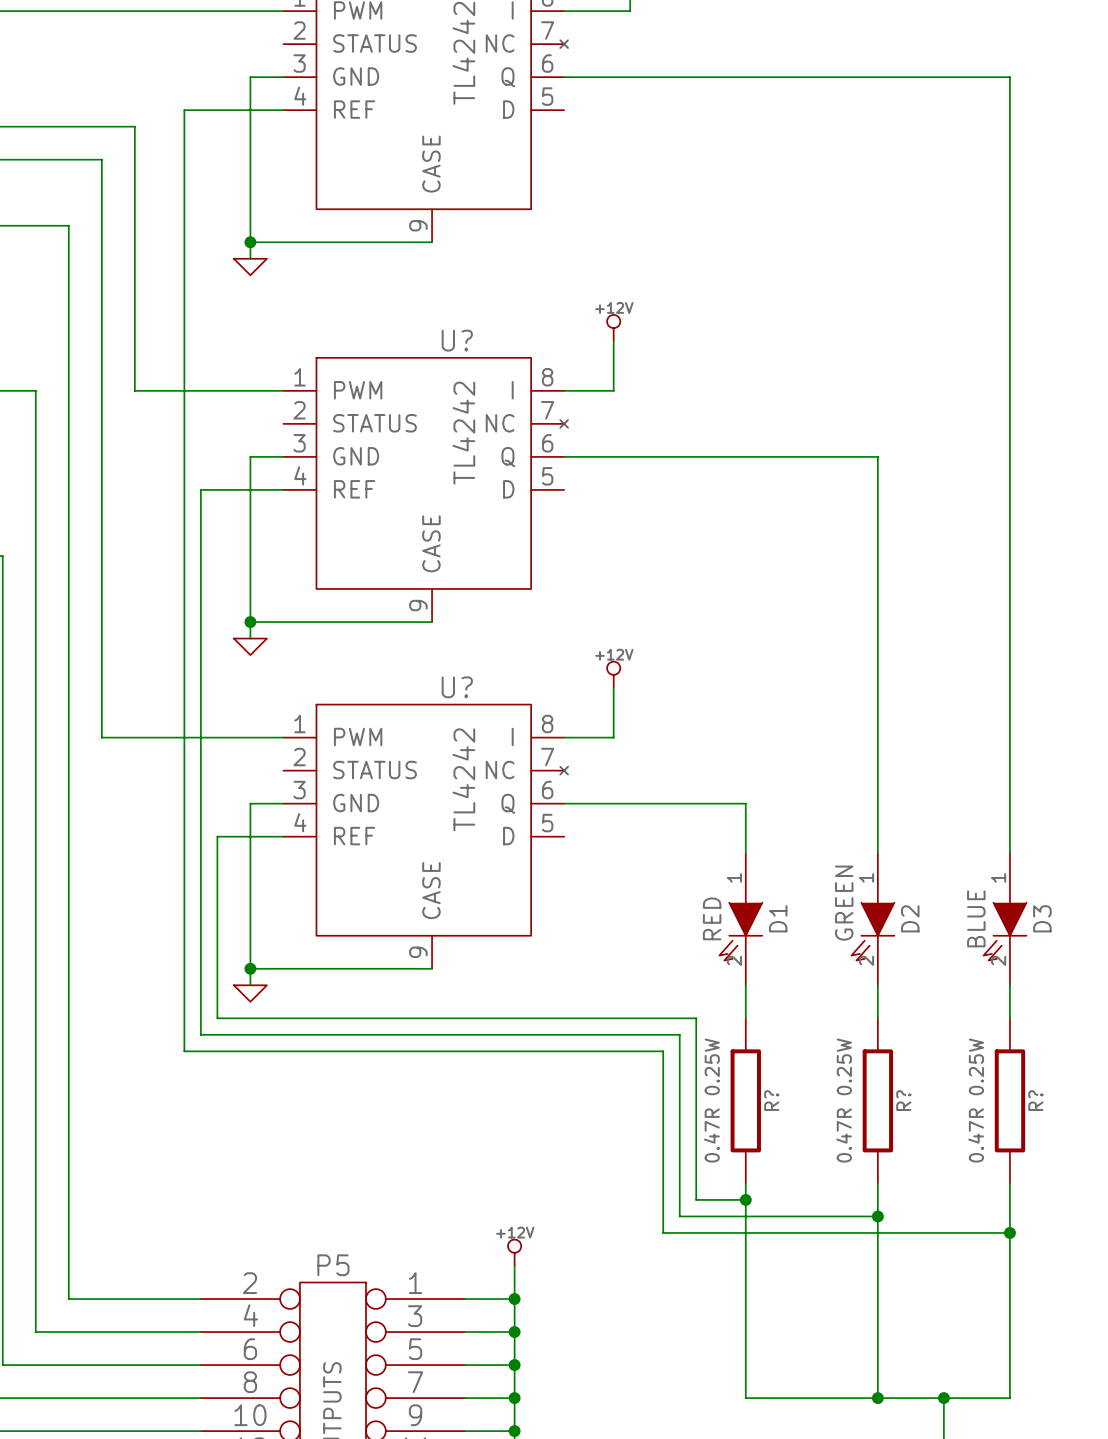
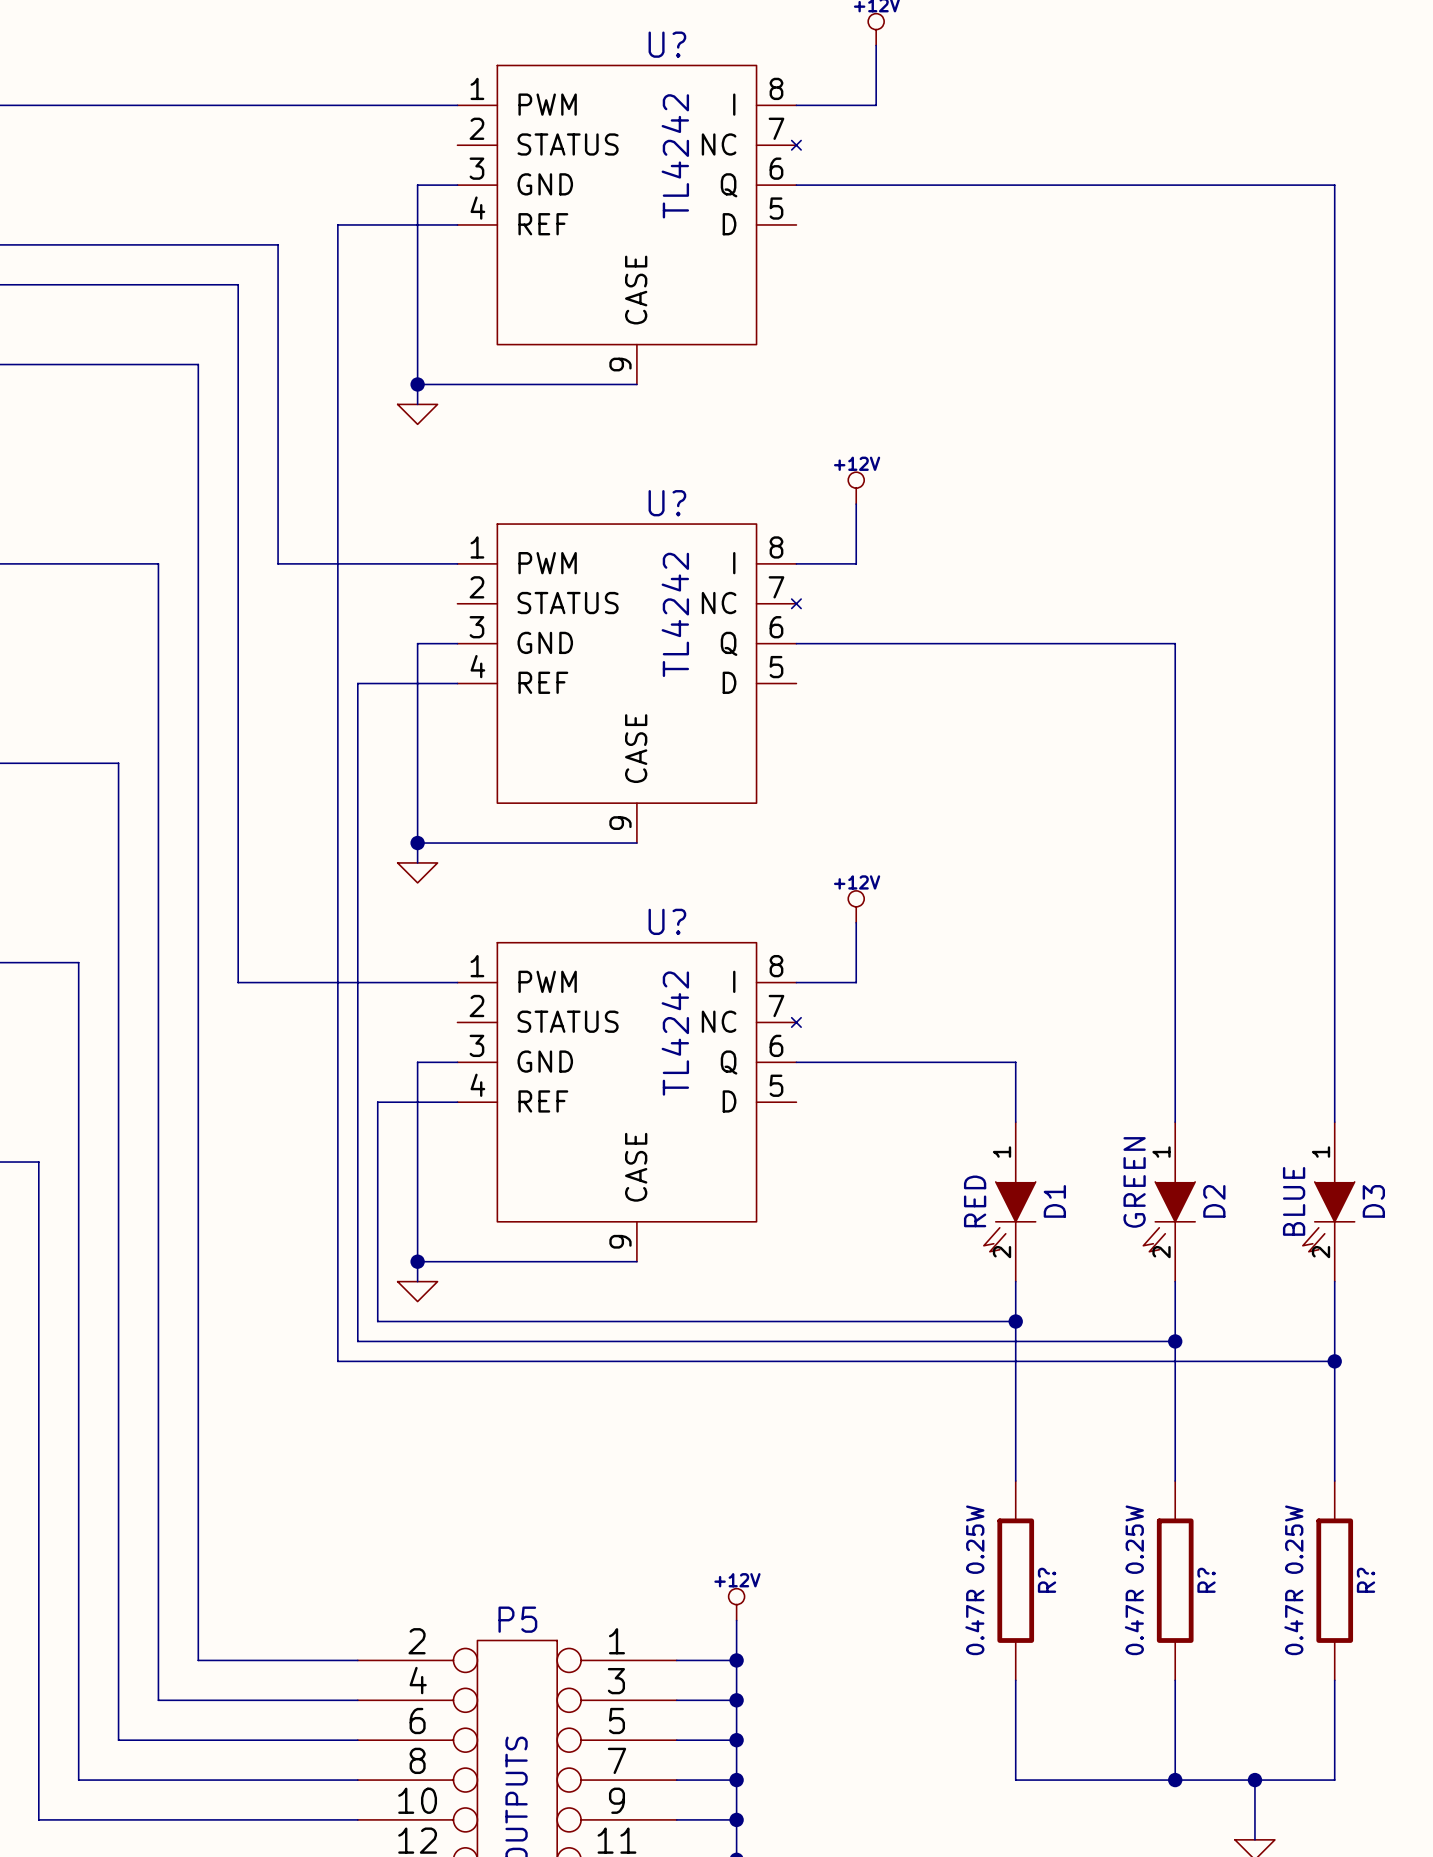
wire: (696, 1018) (696, 1199) (745, 1199) -> (955, 1321) (1015, 1321) (1015, 1481)
junction: none -> (1015, 1321)
wire: (679, 1034) (679, 1216) (877, 1216) -> (935, 1341) (1175, 1341)
junction: none -> (1175, 1341)
wire: (663, 1051) (663, 1232) (1009, 1232) -> (916, 1361) (1334, 1361)
junction: none -> (1334, 1361)
R?: 0.47R 0.25W (745, 1100) -> none
R?: 0.47R 0.25W (877, 1100) -> none
R?: 0.47R 0.25W (1009, 1100) -> none
wire: (745, 1183) (745, 1315) -> none
wire: (877, 1183) (877, 1315) -> (1175, 1321) (1175, 1481)
wire: (1009, 1183) (1009, 1315) -> (1334, 1321) (1334, 1481)
junction: (745, 1199) -> none
junction: (877, 1216) -> none
R?: none -> 0.47R 0.25W (1015, 1580)
R?: none -> 0.47R 0.25W (1175, 1580)
R?: none -> 0.47R 0.25W (1334, 1580)
junction: (1009, 1232) -> none

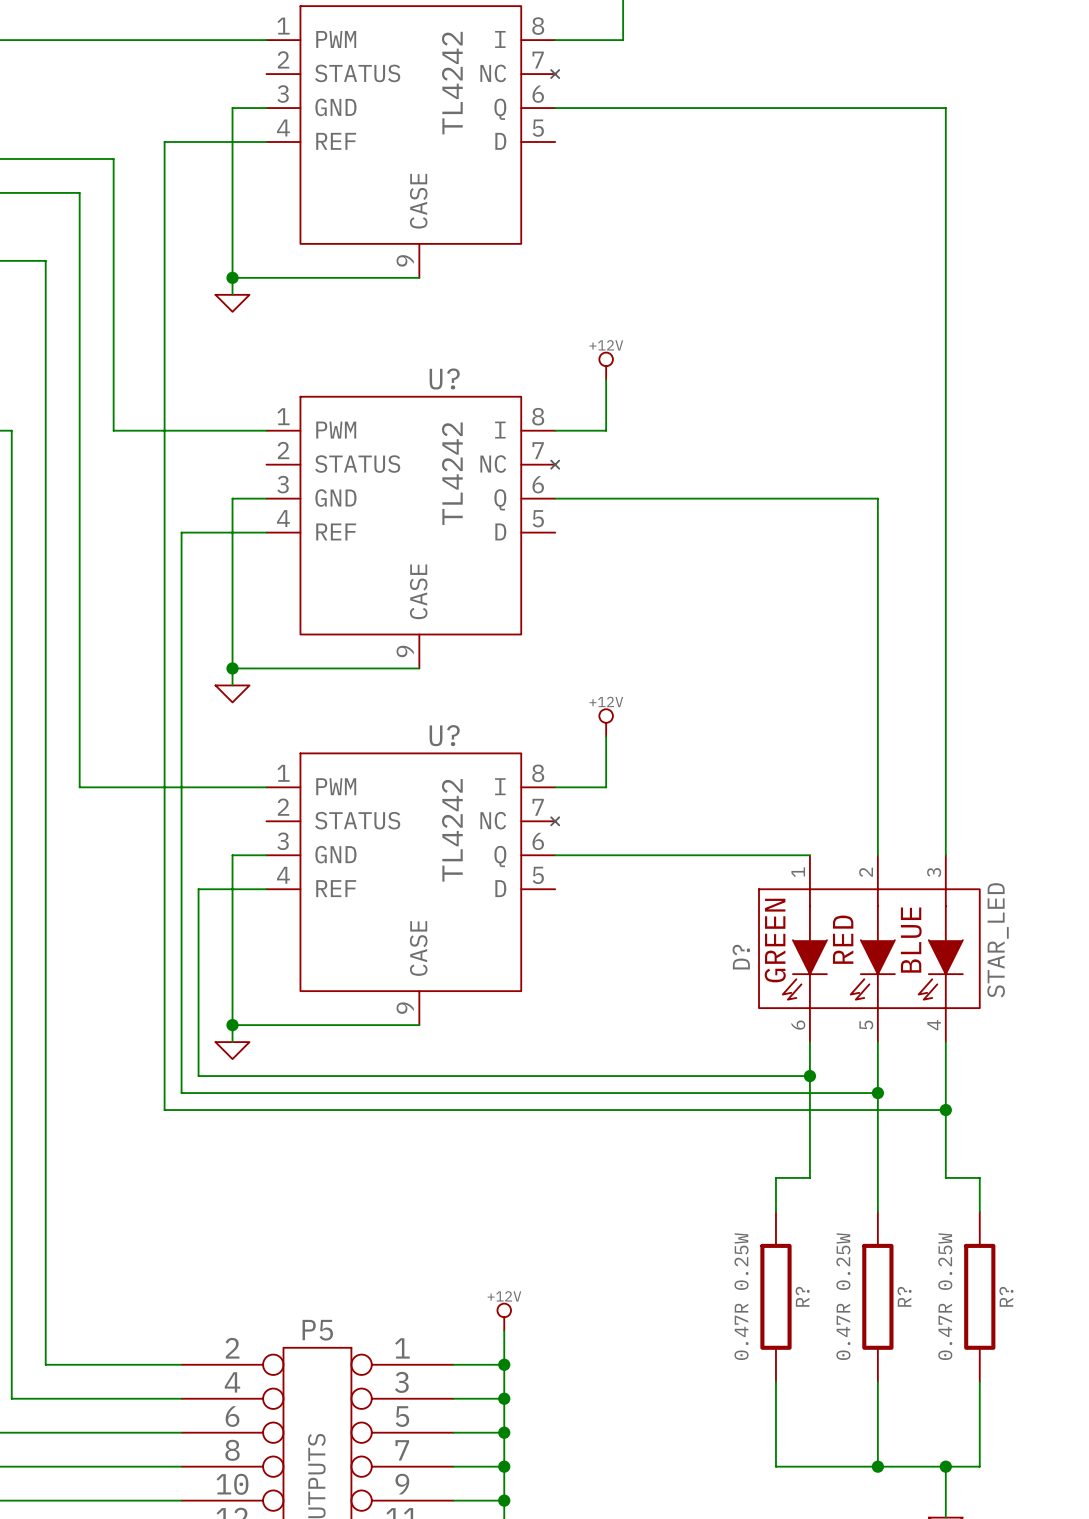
wire: (1254, 185) (1334, 185) (1334, 1122) -> (945, 108) (945, 855)
wire: (1015, 1062) (1015, 1122) -> (742, 855) (809, 855)
D?: none -> STAR_LED (869, 948)
D1: RED (1009, 1201) -> none
D2: GREEN (1169, 1201) -> none
D3: BLUE (1328, 1201) -> none
wire: (1015, 1281) (1015, 1481) -> none
wire: none -> (809, 1042) (809, 1177) (775, 1177) (775, 1211)
wire: none -> (945, 1042) (945, 1177) (979, 1177) (979, 1211)
wire: (1334, 1281) (1334, 1481) -> none
junction position: (1015, 1321) -> (809, 1076)
wire: (1254, 1361) (1334, 1361) -> (742, 1076) (809, 1076)
junction position: (1334, 1361) -> (945, 1110)
R? position: (1015, 1580) -> (775, 1296)
R? position: (1334, 1580) -> (979, 1296)
wire: (1015, 1680) (1015, 1780) (1055, 1780) -> (775, 1381) (775, 1466)
wire: (1334, 1680) (1334, 1780) (1294, 1780) -> (979, 1381) (979, 1466)

